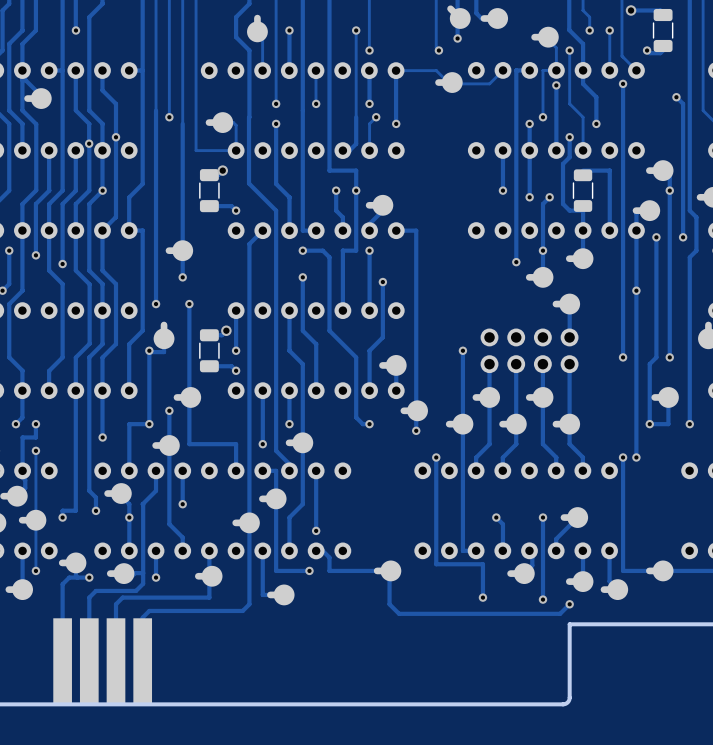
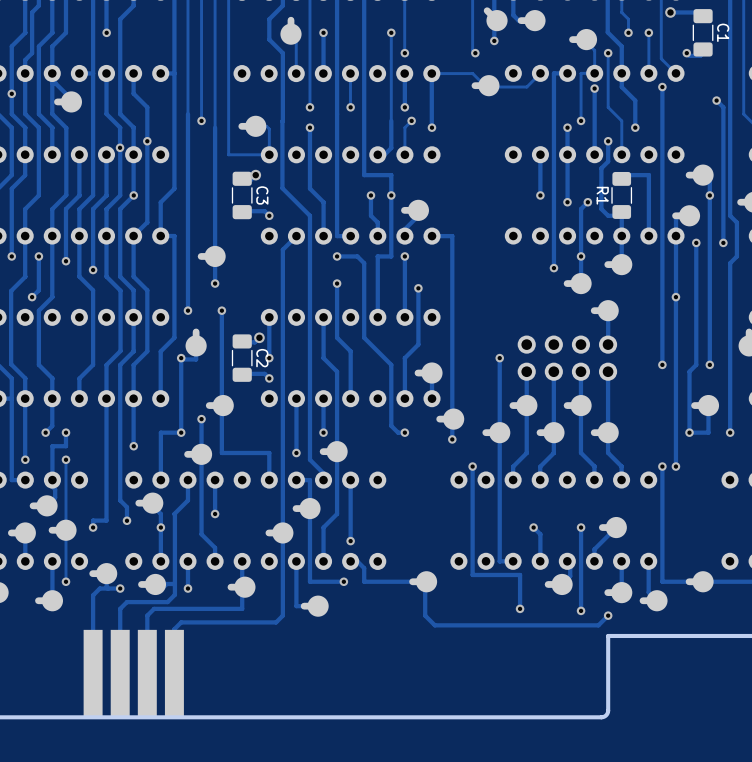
part: (663, 30) -> none
C1: none -> (703, 32)
part: (209, 190) -> none
C3: none -> (242, 195)
part: (583, 190) -> none
R1: none -> (621, 195)
part: (209, 350) -> none
C2: none -> (242, 358)

